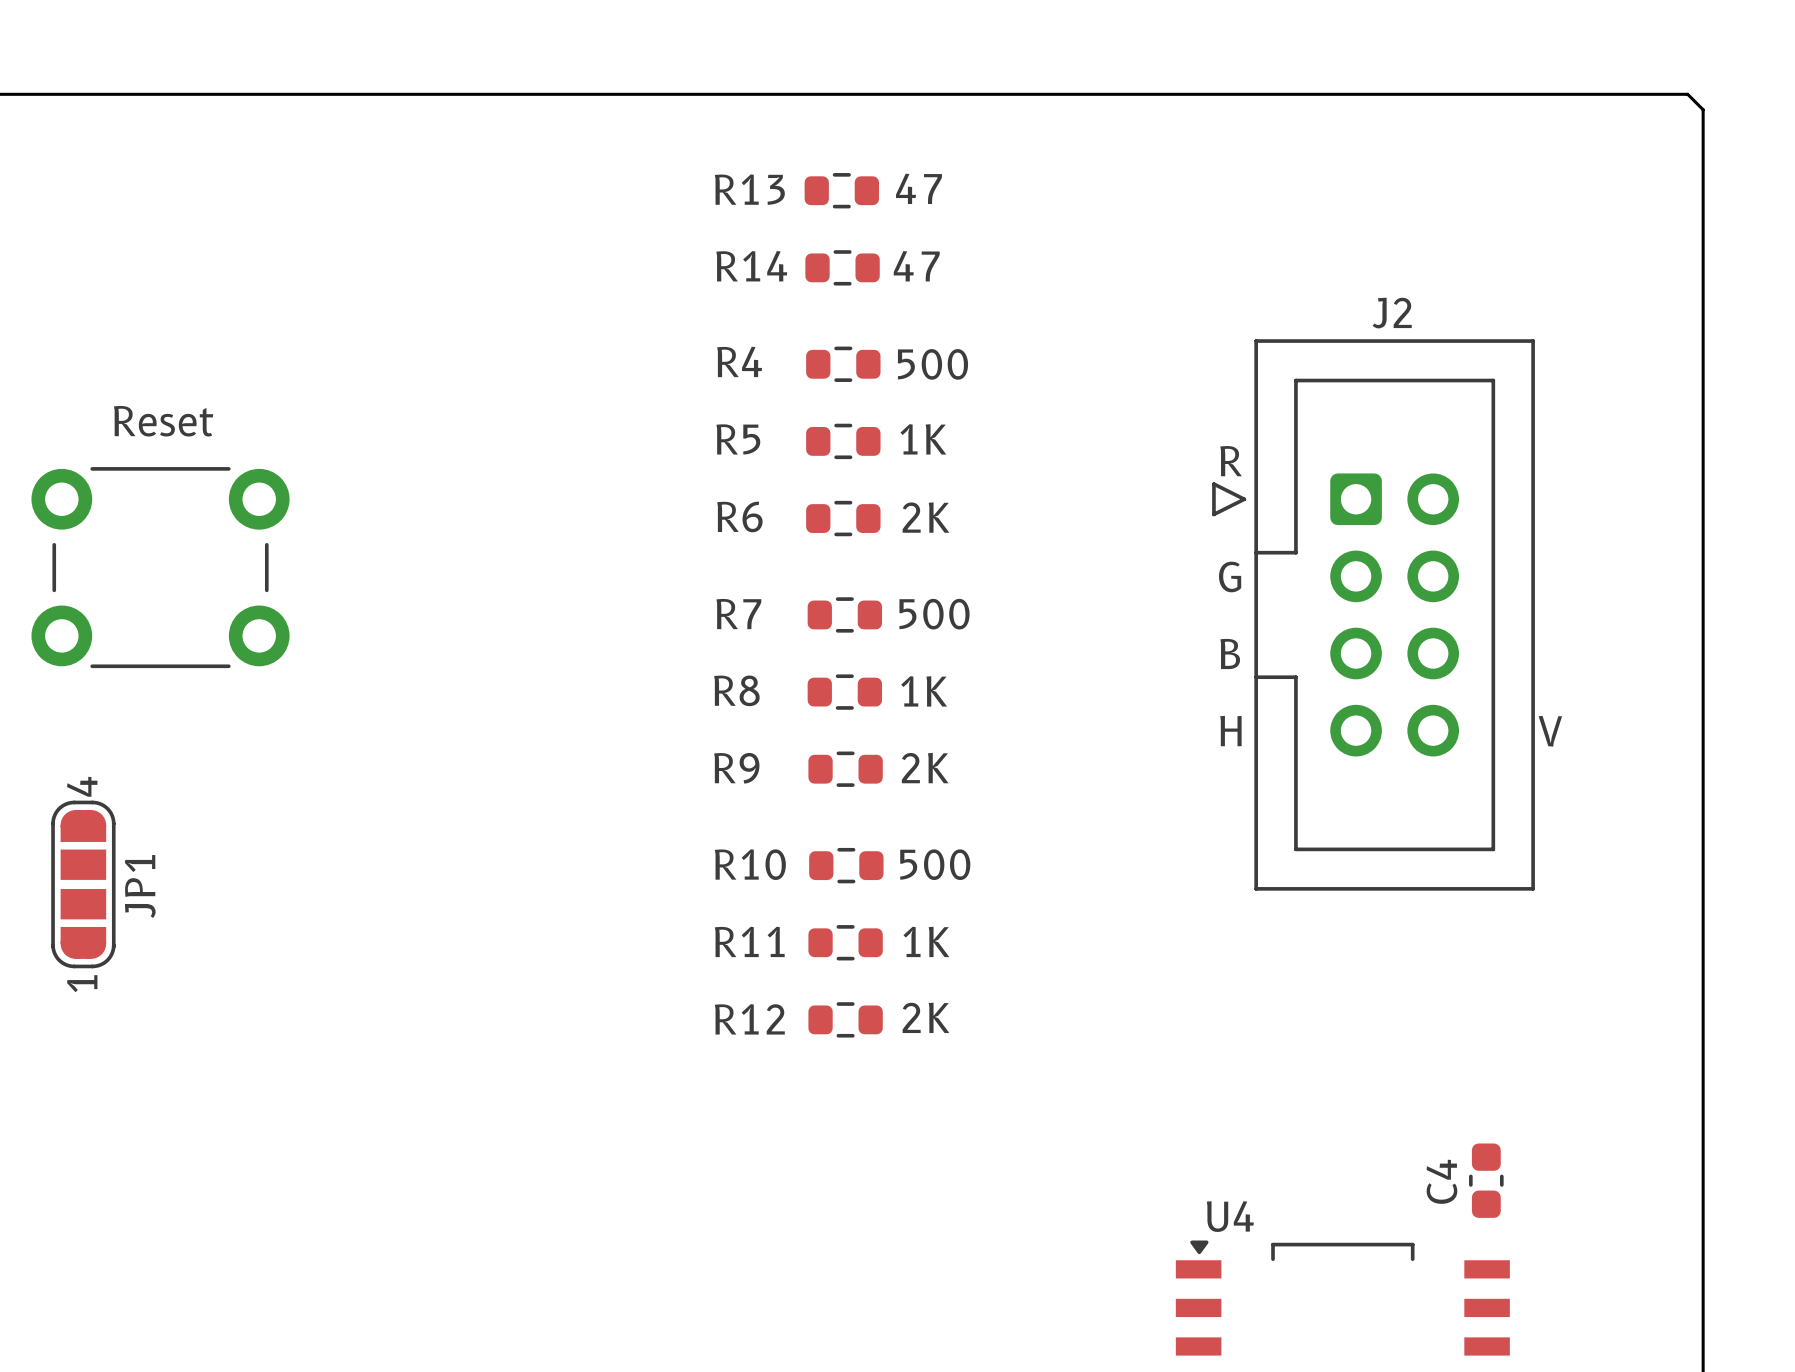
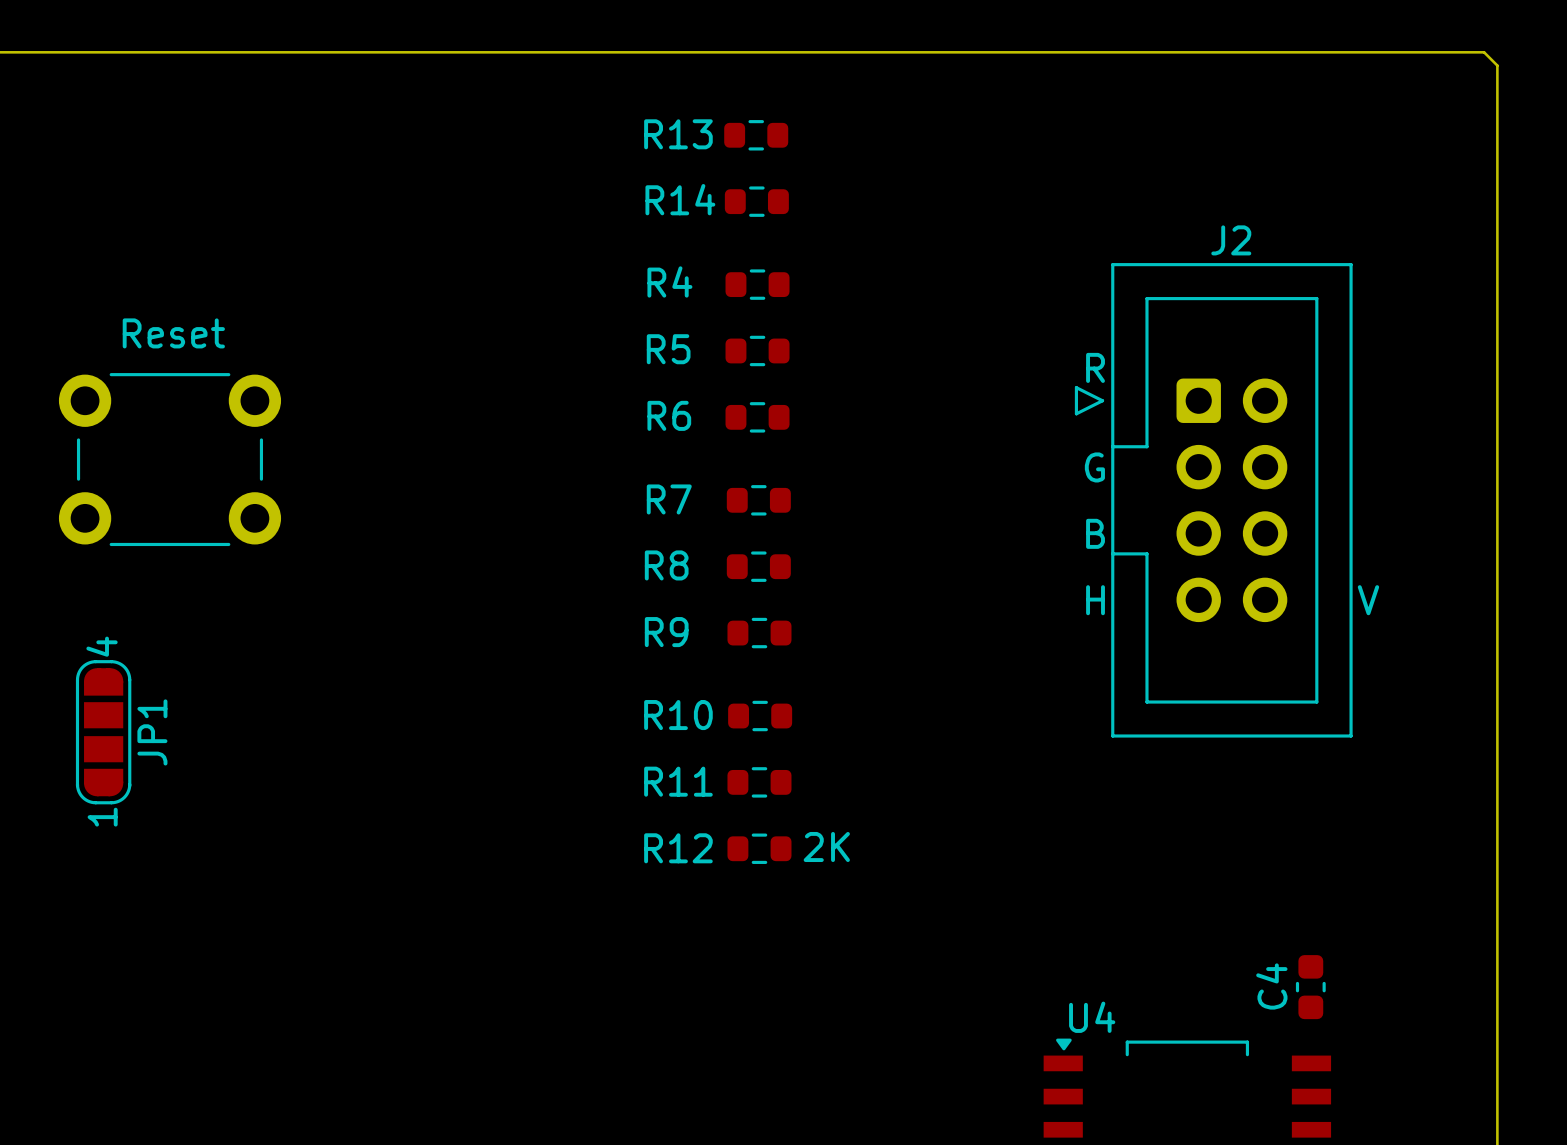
R13 value: 47 (918, 188) -> none
R14 value: 47 (916, 266) -> none
R4 value: 500 (933, 364) -> none
R5 value: 1K (923, 439) -> none
R6 value: 2K (925, 517) -> none
R7 value: 500 (934, 614) -> none
R8 value: 1K (924, 691) -> none
R9 value: 2K (925, 768) -> none
R10 value: 500 (935, 864) -> none
R11 value: 1K (926, 941) -> none

